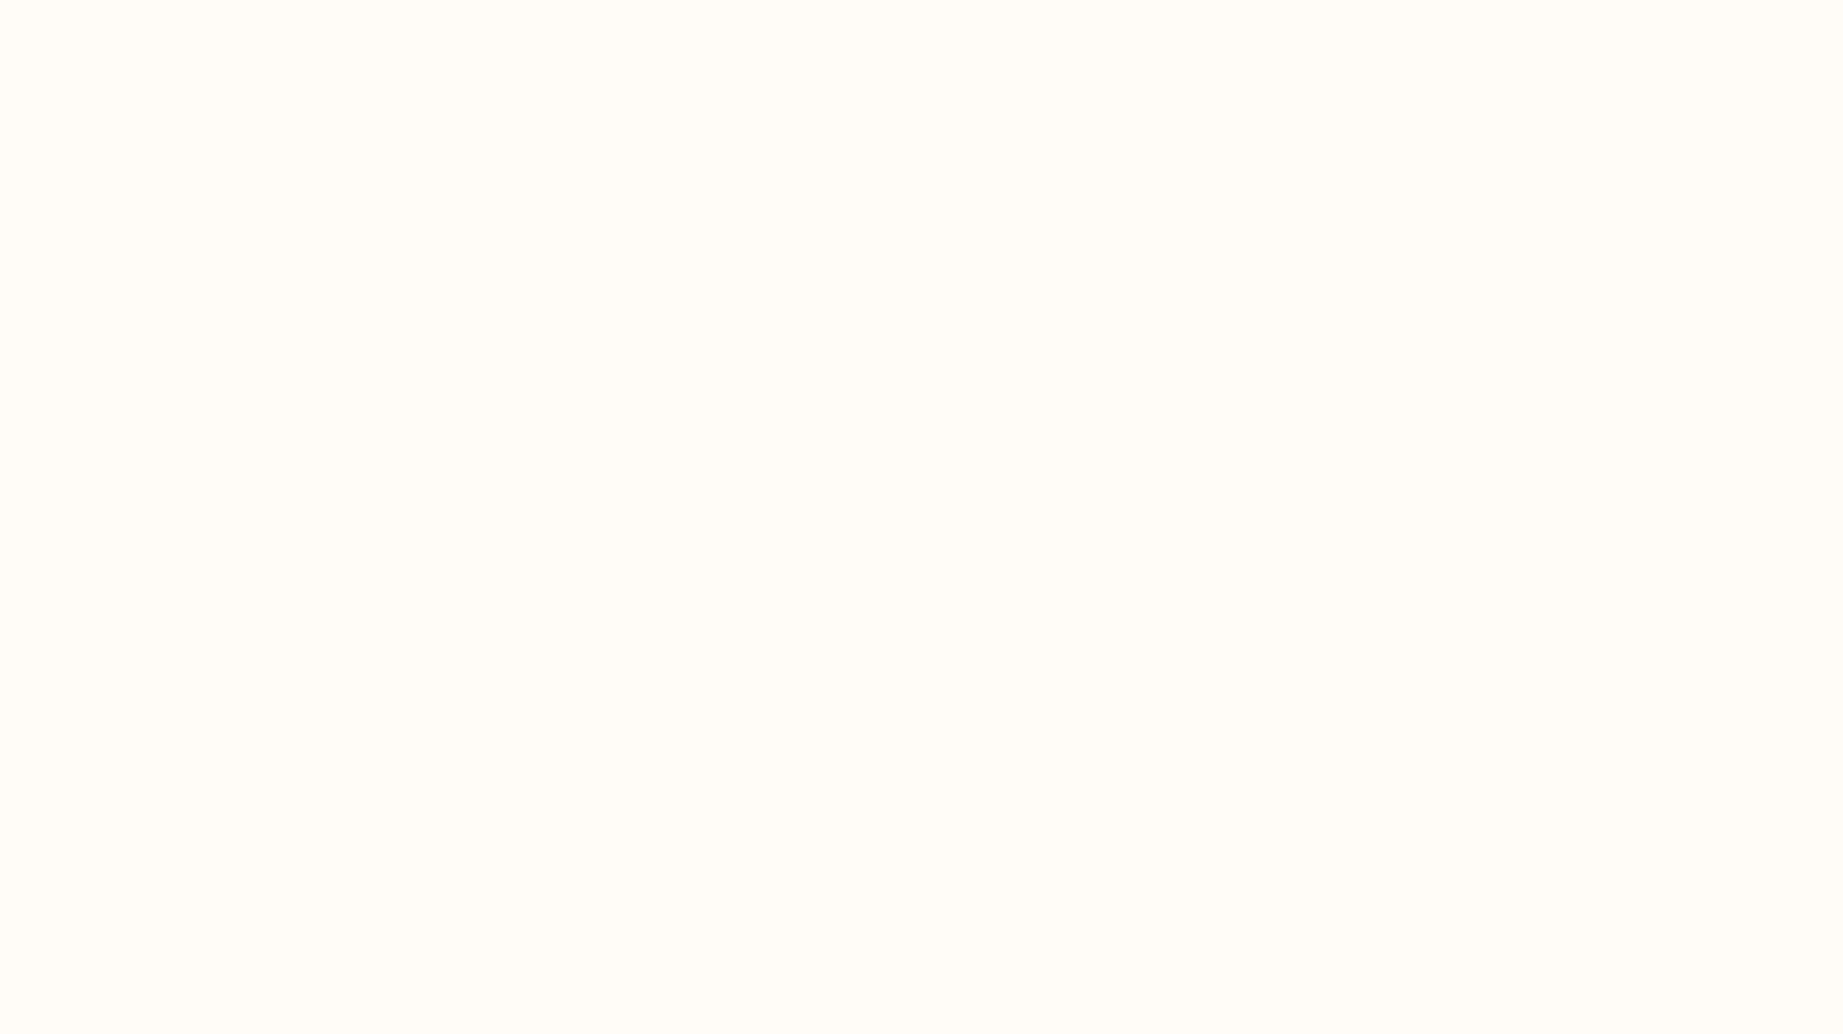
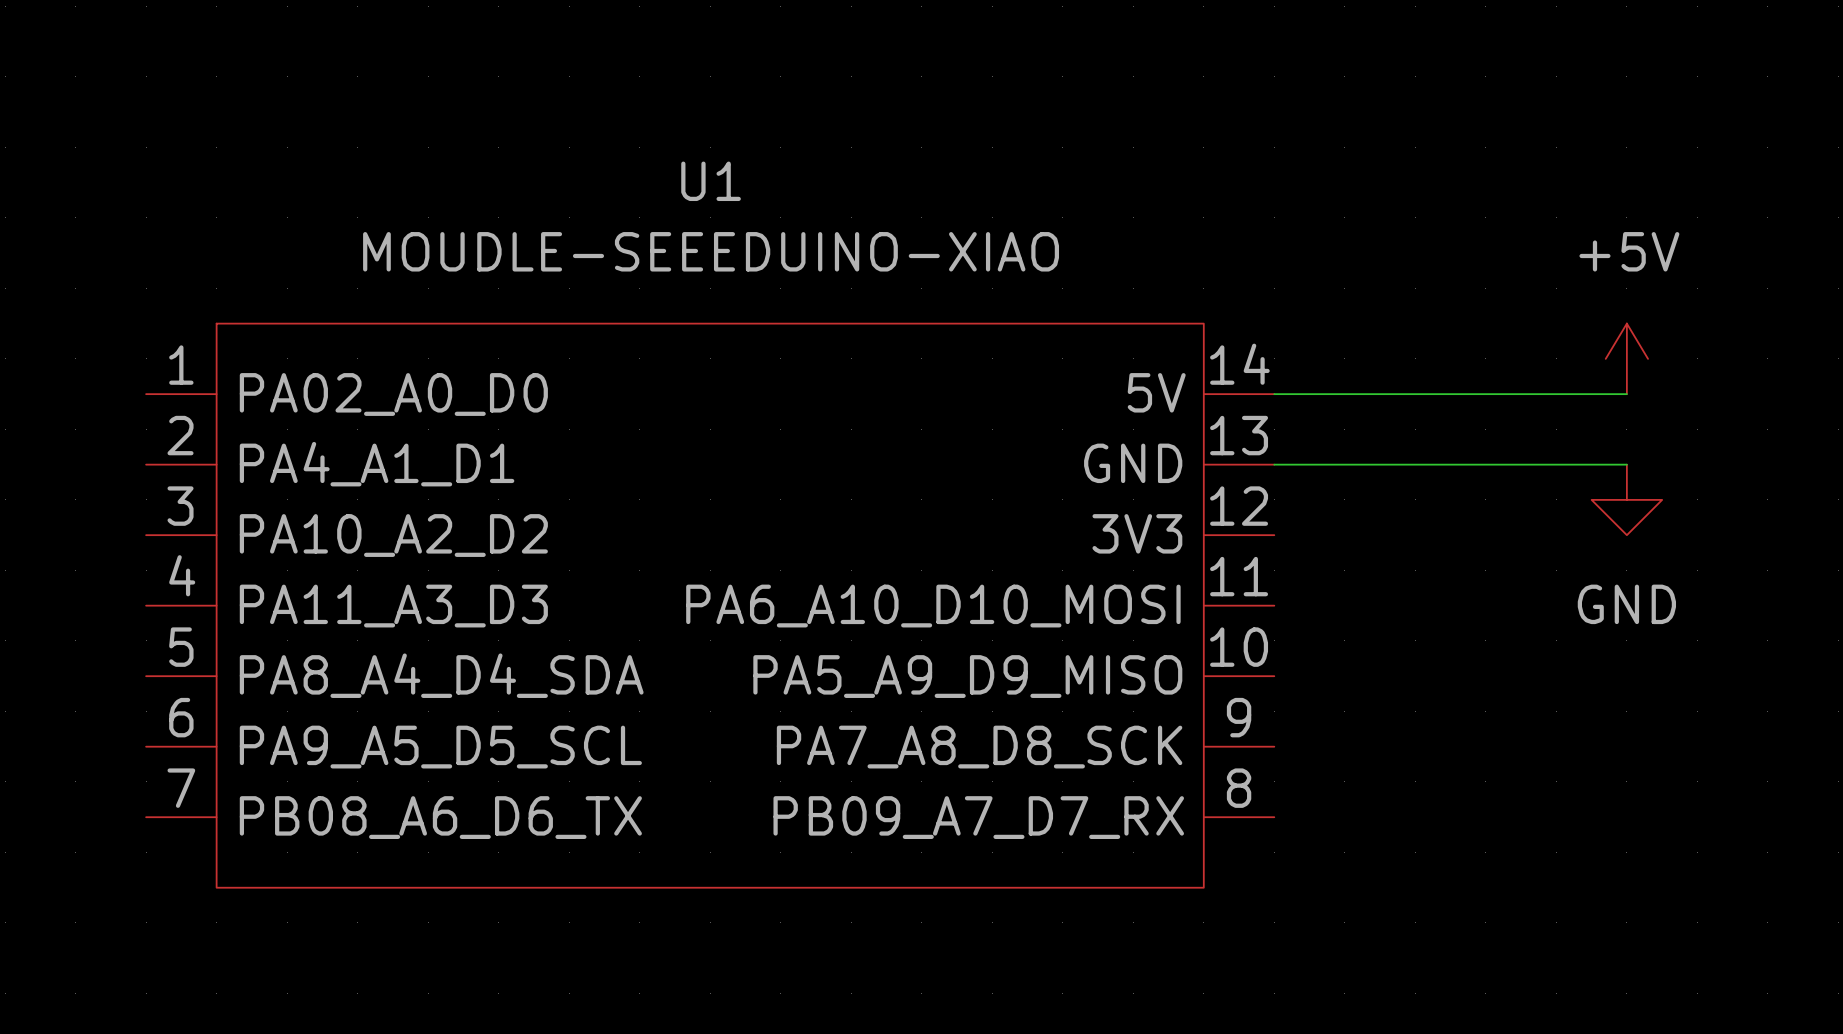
power symbol: none -> +5V (1626, 358)
wire: none -> (1274, 394) (1626, 394)
wire: none -> (1274, 464) (1626, 464)
power symbol: none -> GND (1626, 499)
U1: none -> MOUDLE-SEEEDUINO-XIAO (710, 605)

